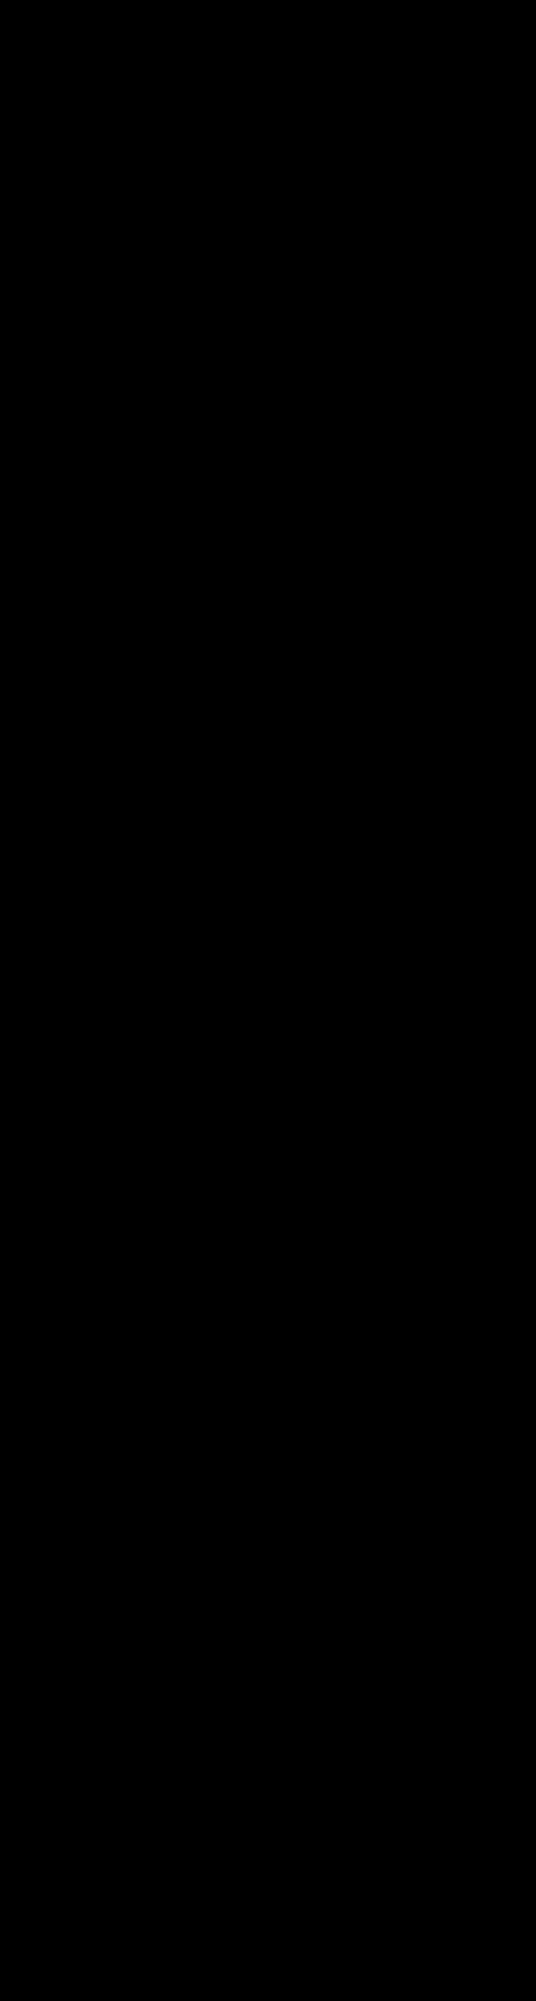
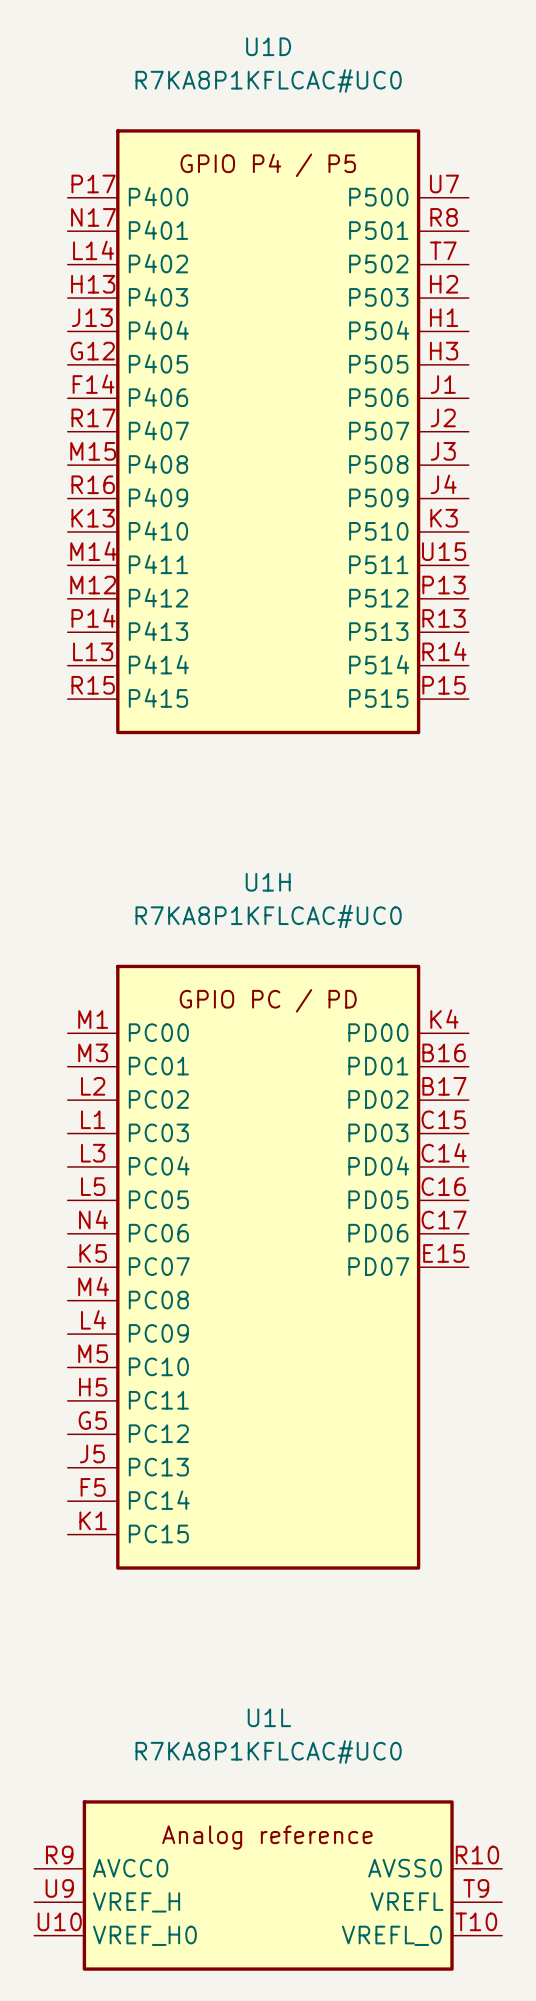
U1D: none -> R7KA8P1KFLCAC#UC0 (268, 431)
U1H: none -> R7KA8P1KFLCAC#UC0 (268, 1267)
U1L: none -> R7KA8P1KFLCAC#UC0 (268, 1885)

